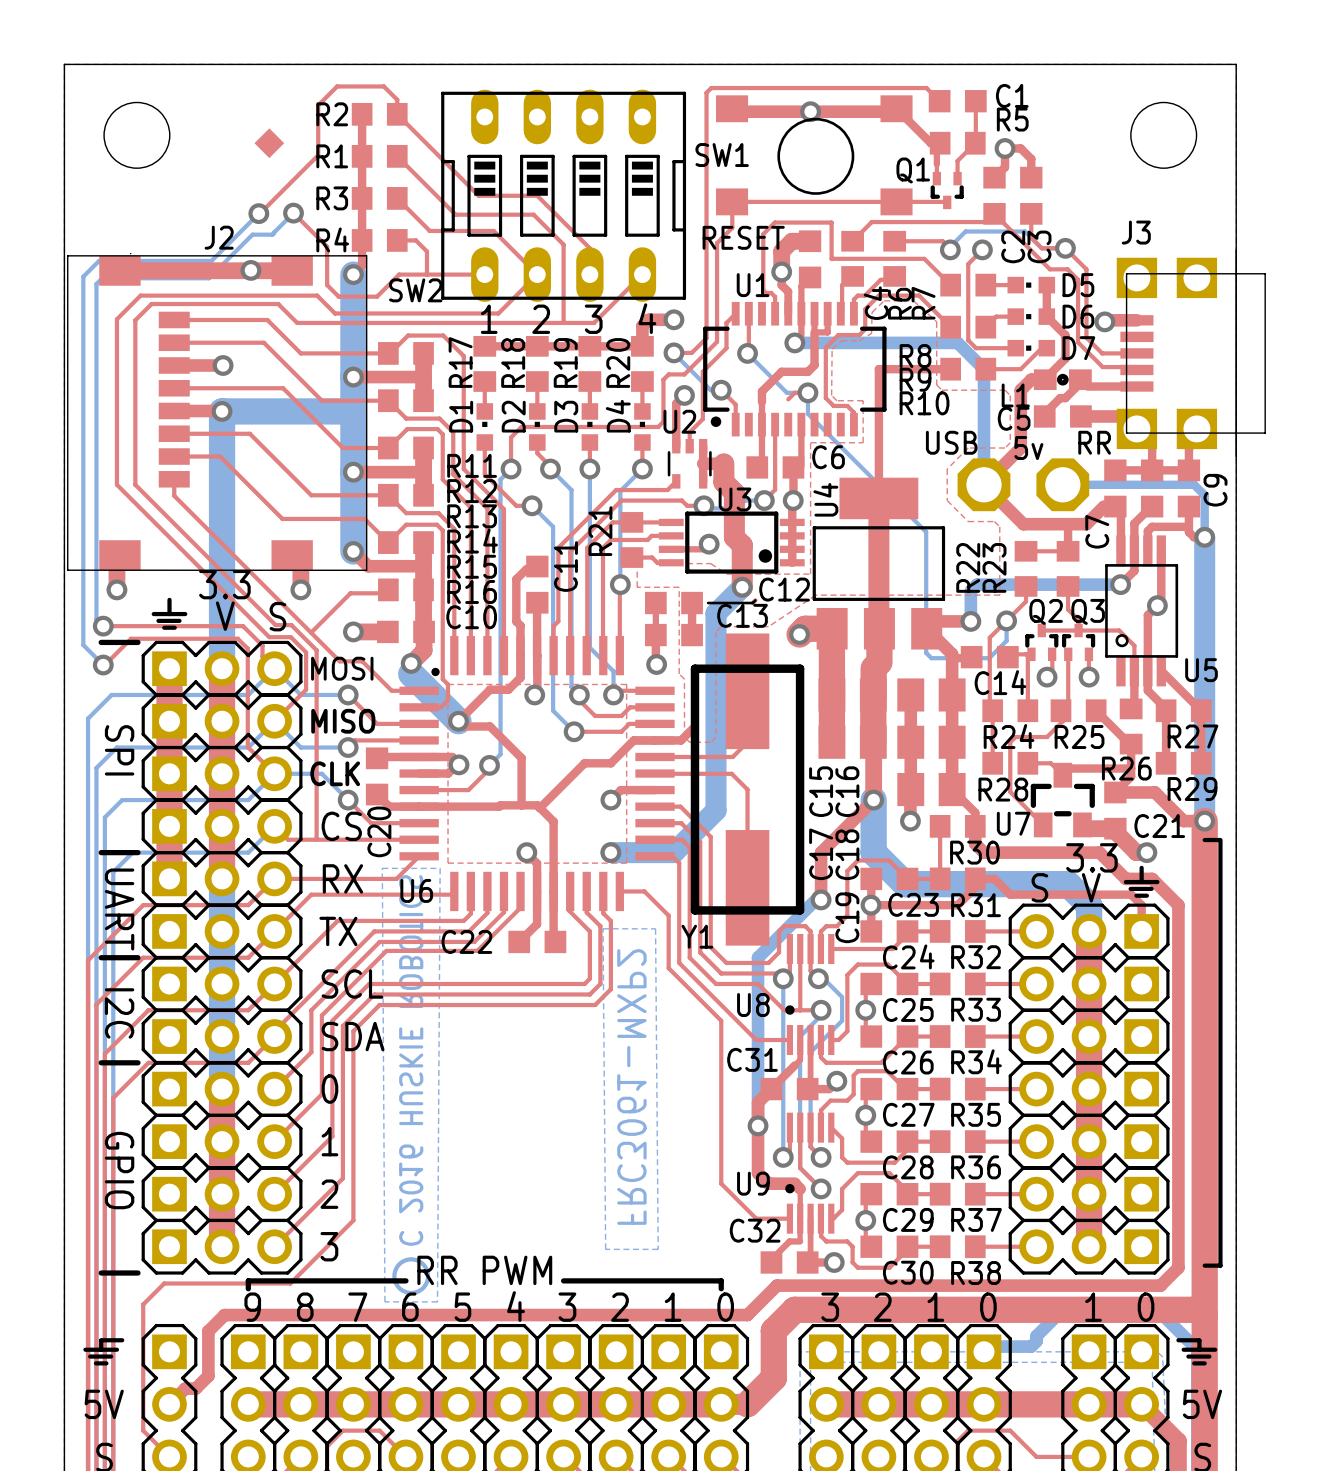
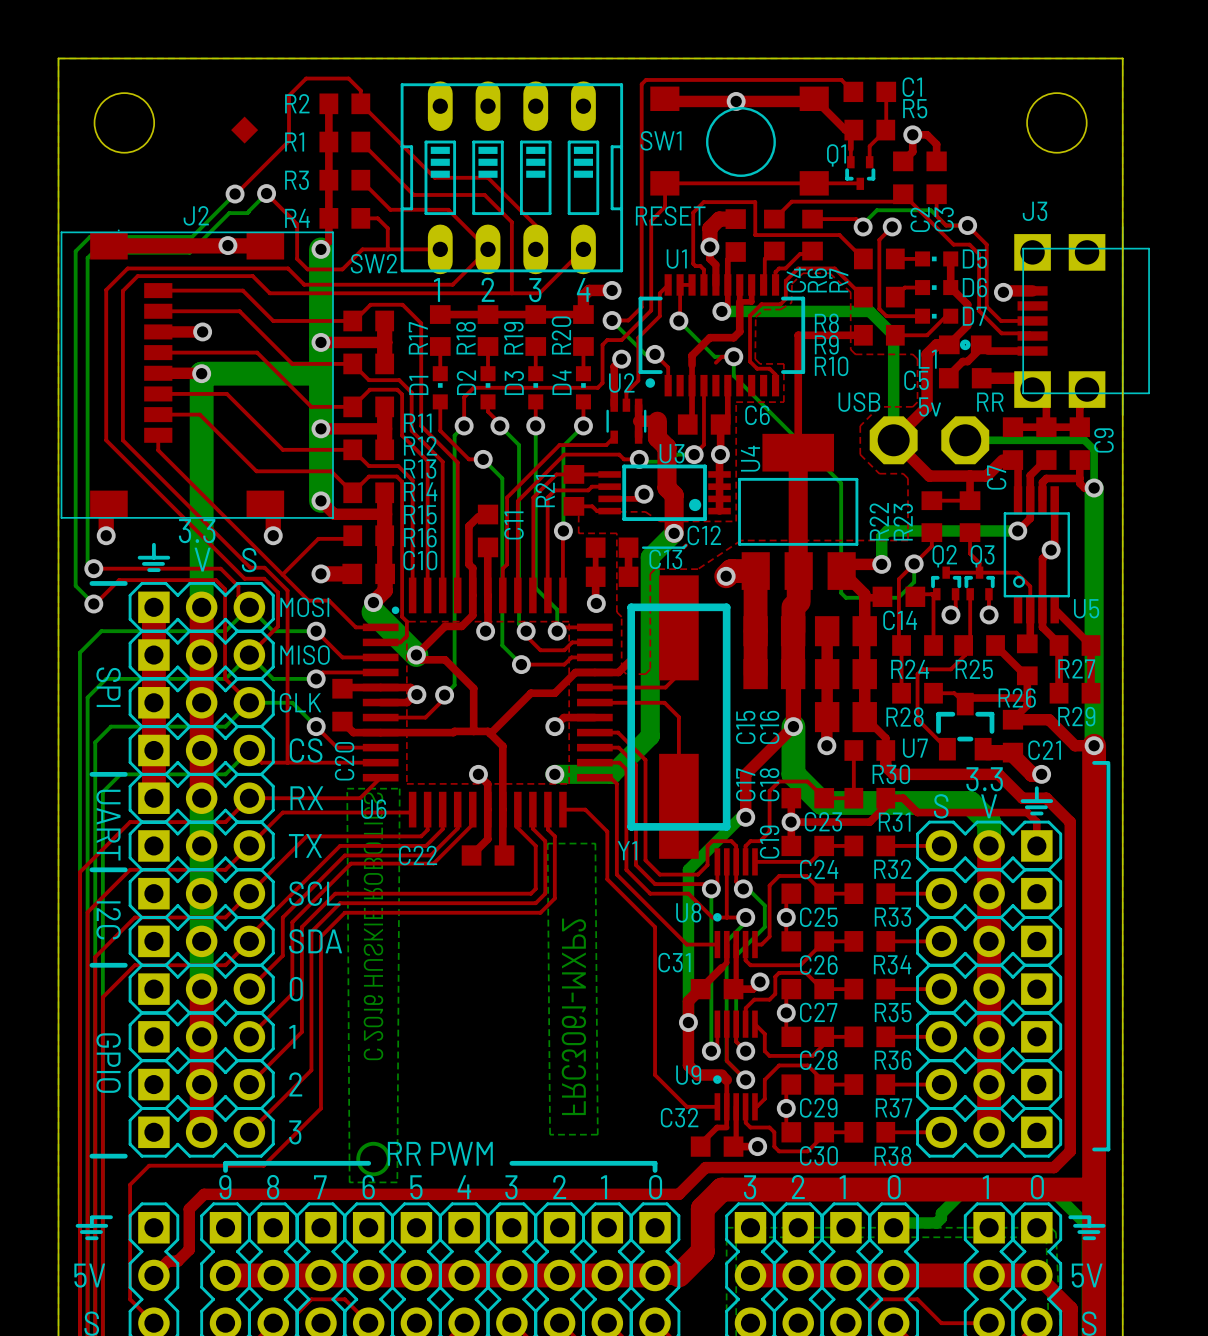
top track: none -> (680, 284) (692, 284)

